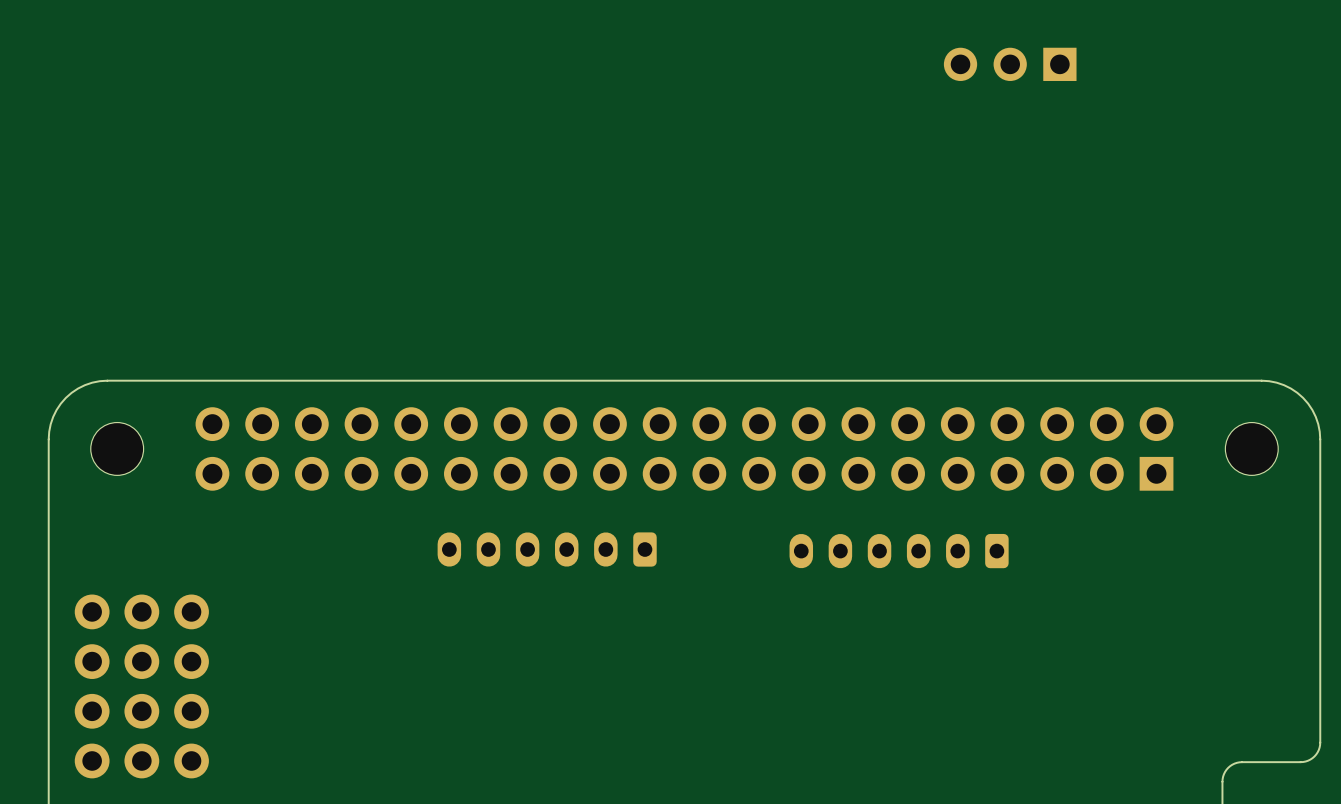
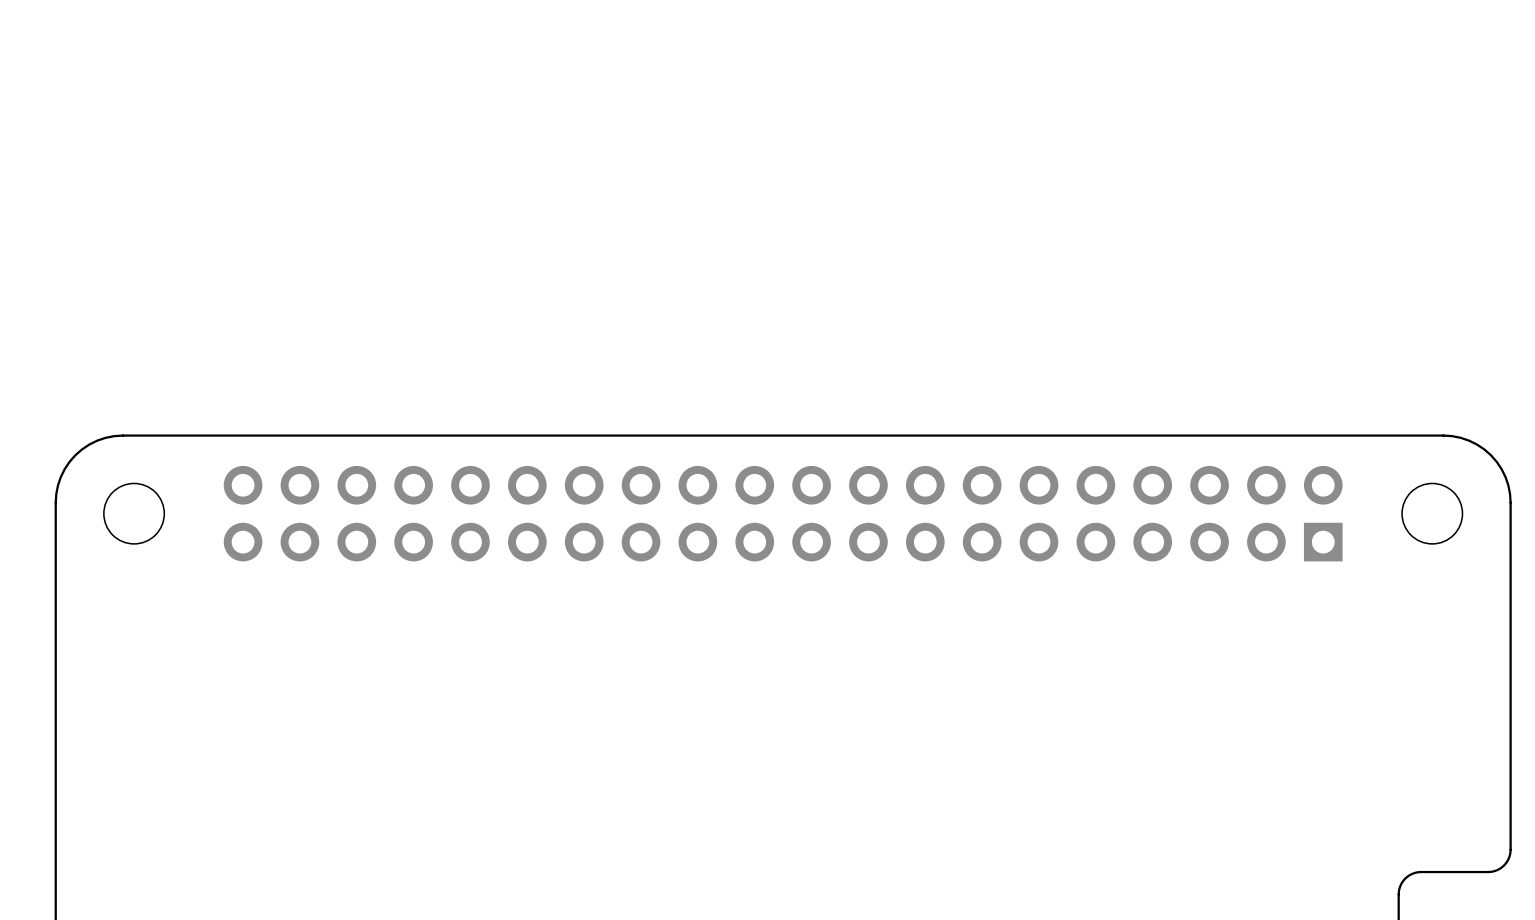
part: (1010, 64) -> none
part: (547, 549) -> none
part: (899, 551) -> none
part: (141, 686) -> none

